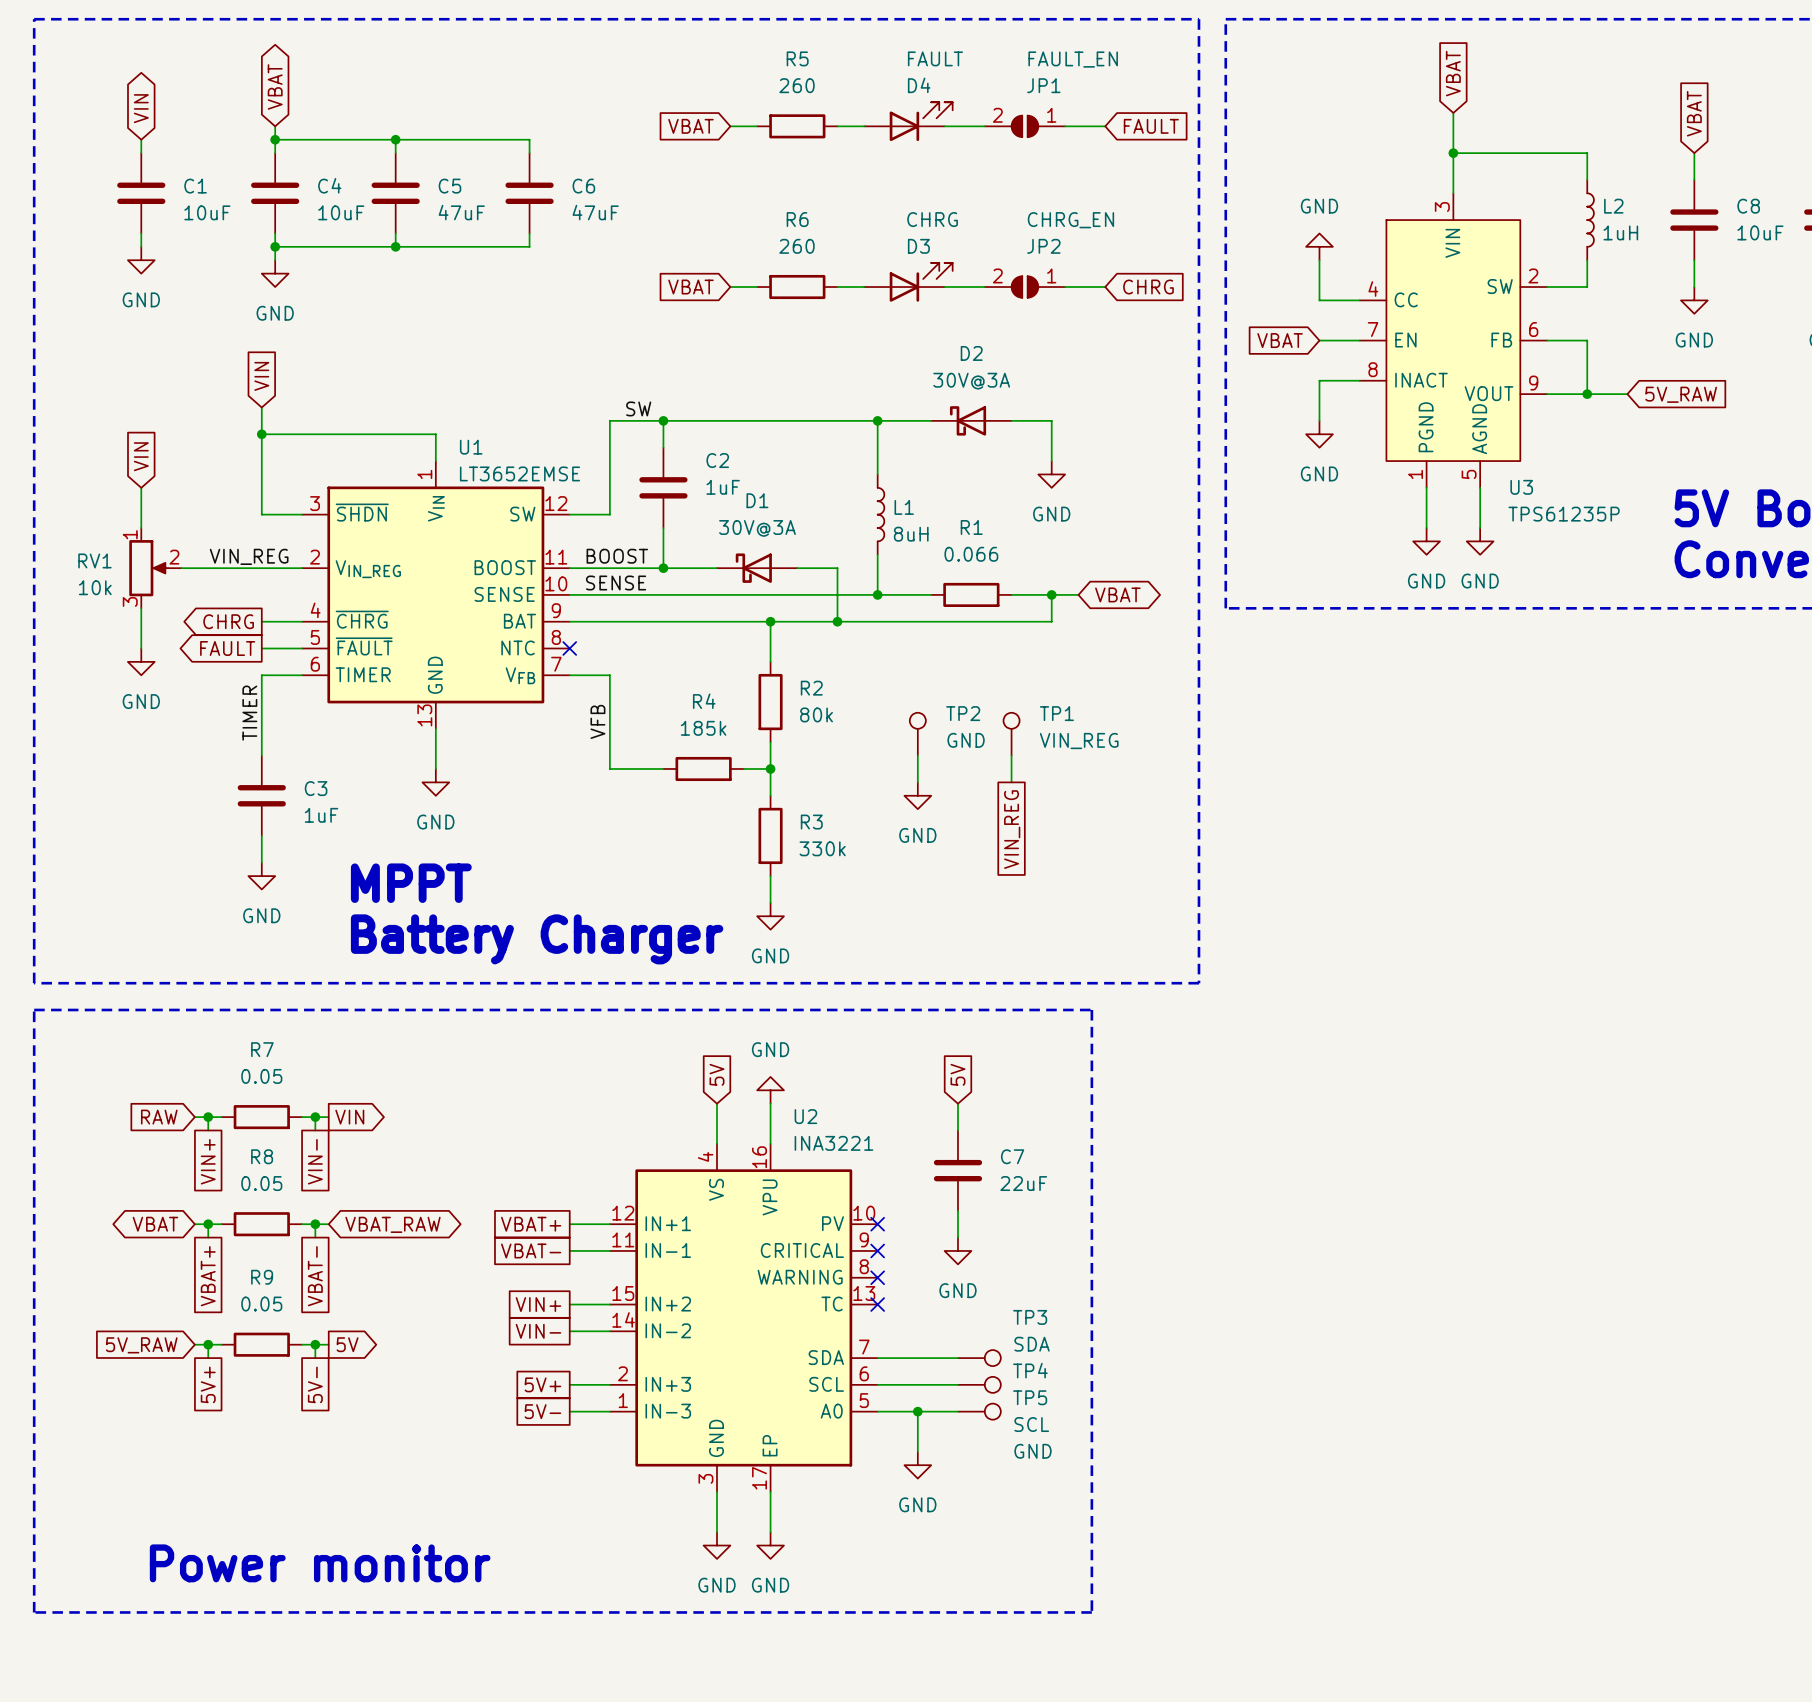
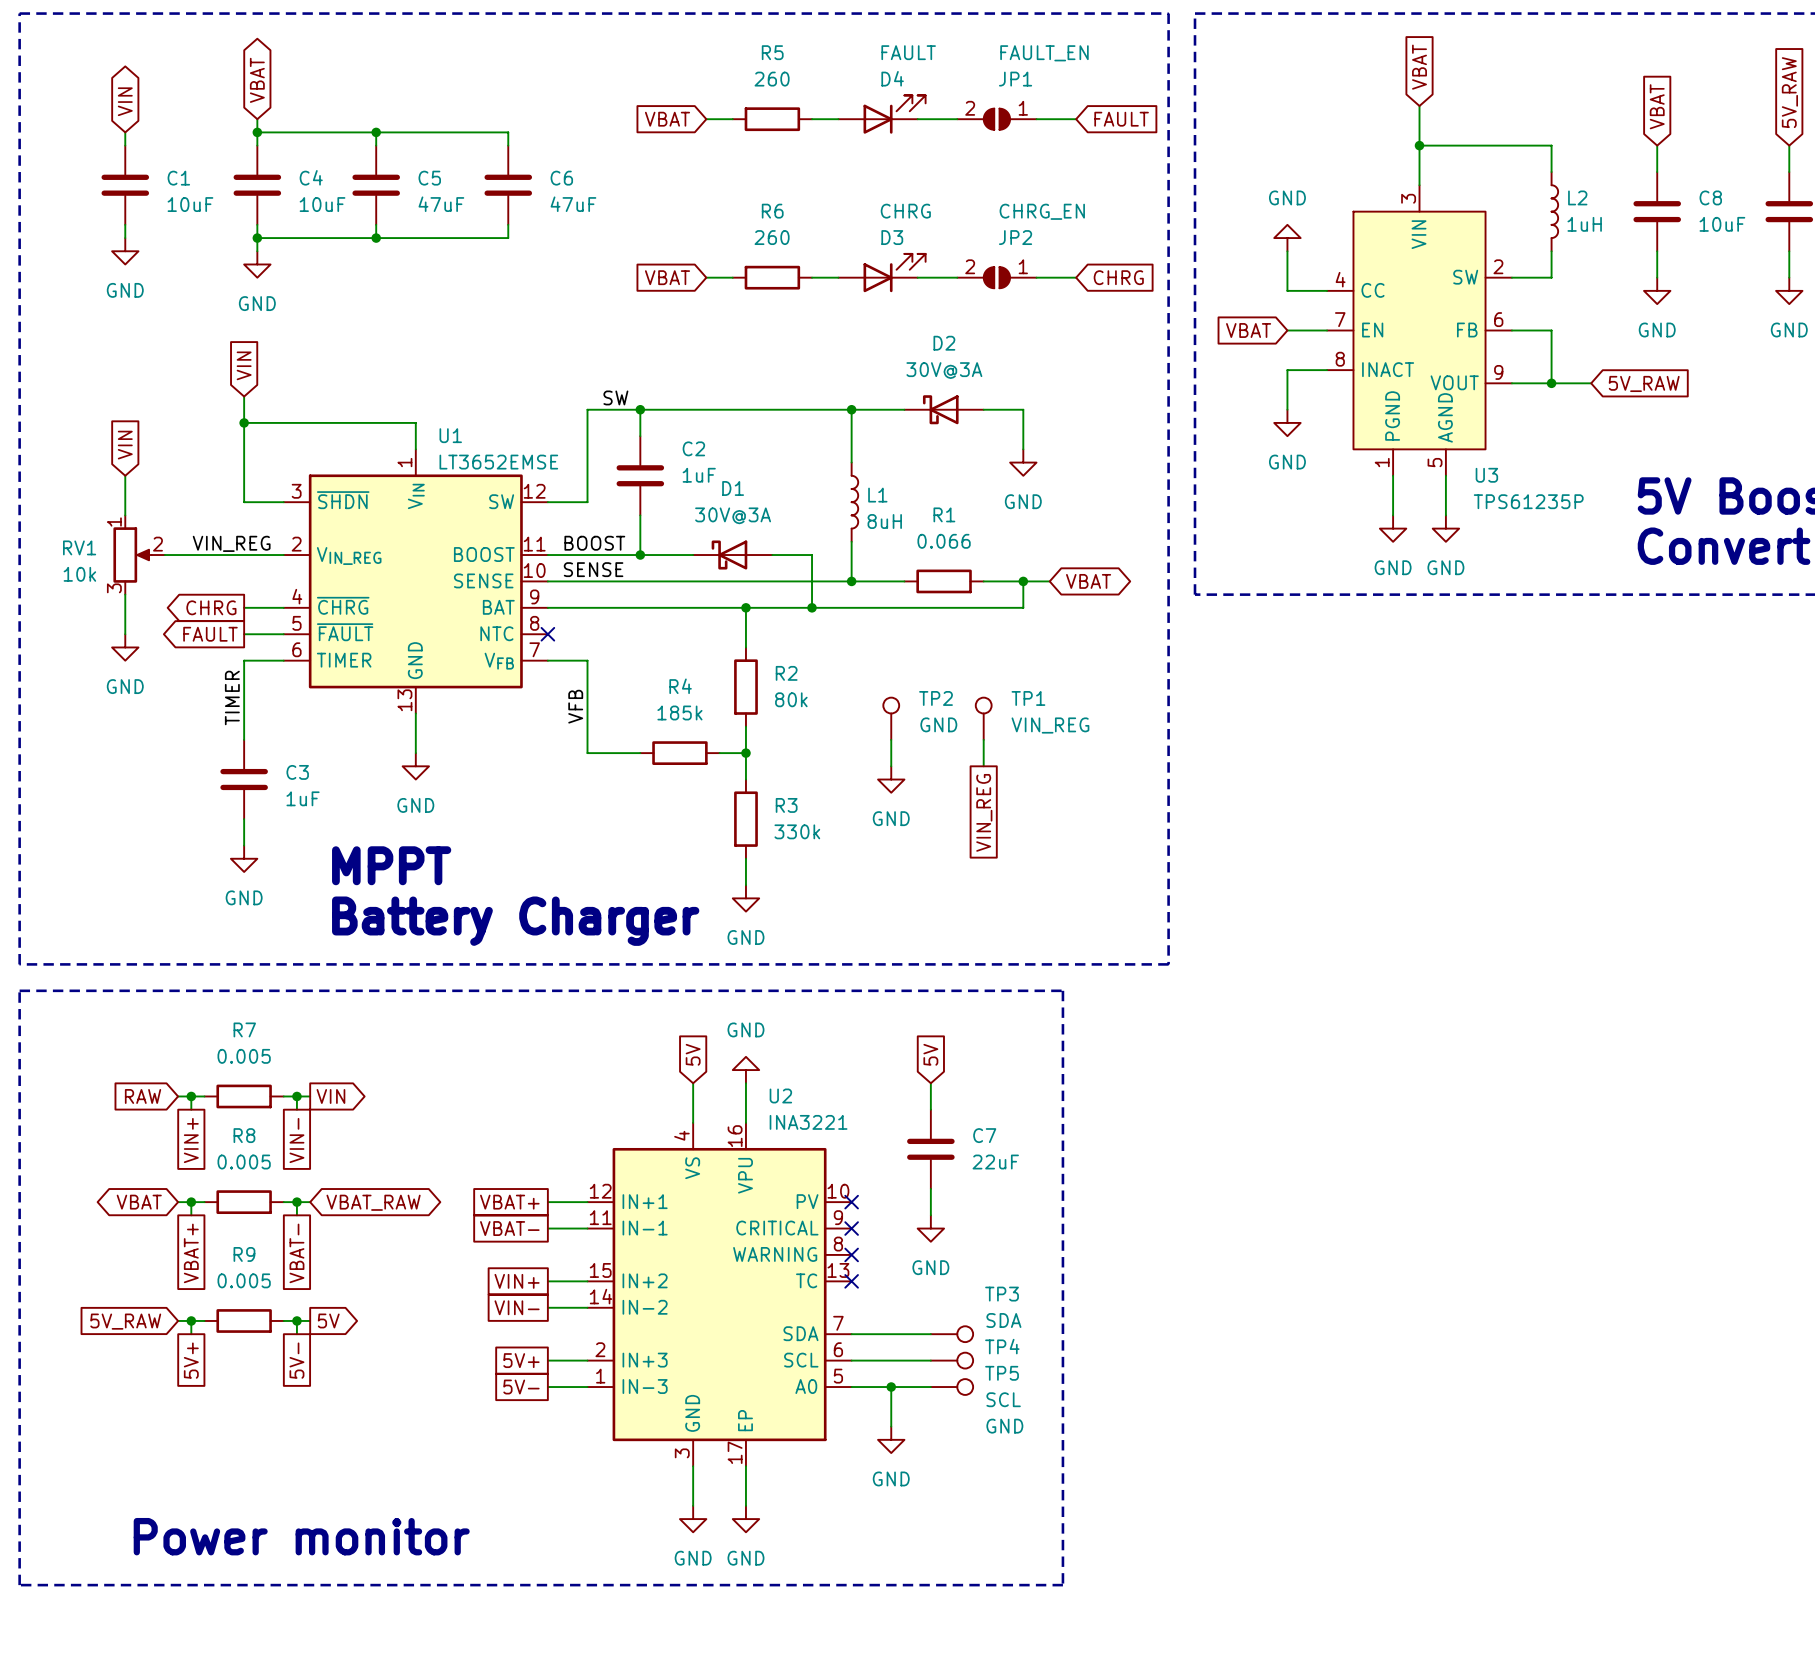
R7 value: 0.05 (261, 1076) -> 0.005 (244, 1056)
R8 value: 0.05 (261, 1183) -> 0.005 (244, 1162)
R9 value: 0.05 (261, 1304) -> 0.005 (244, 1280)

